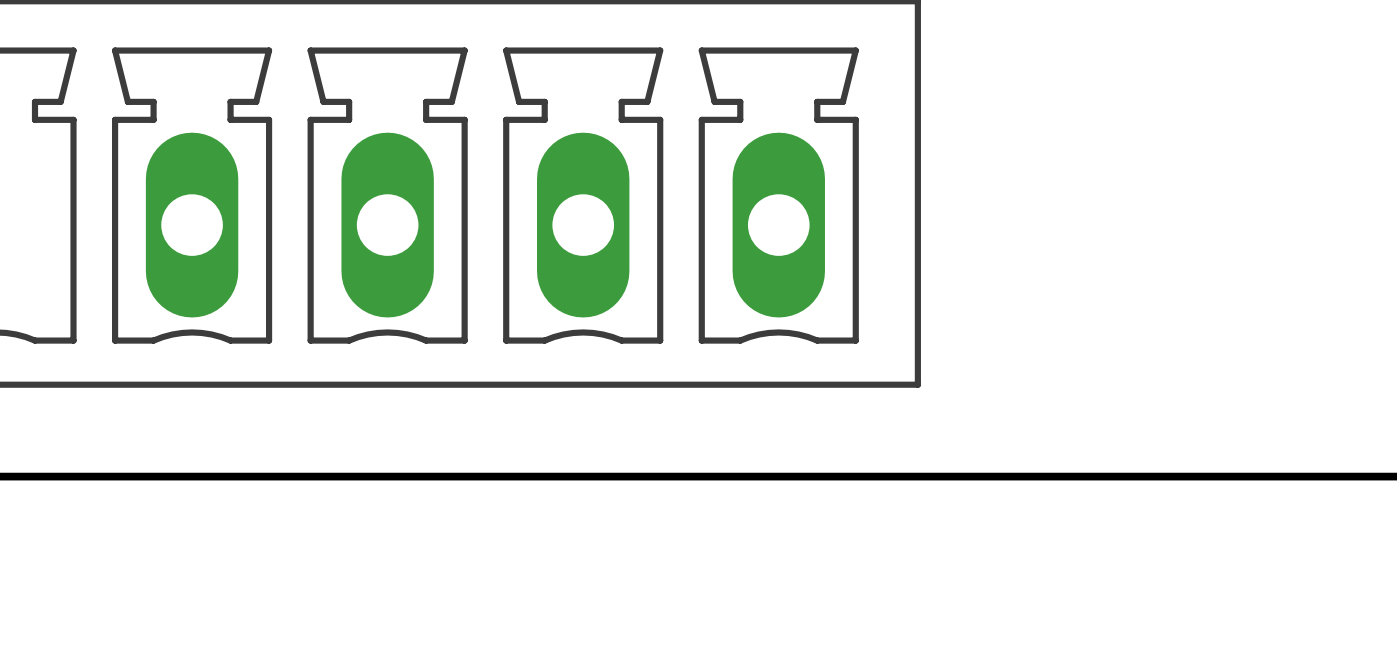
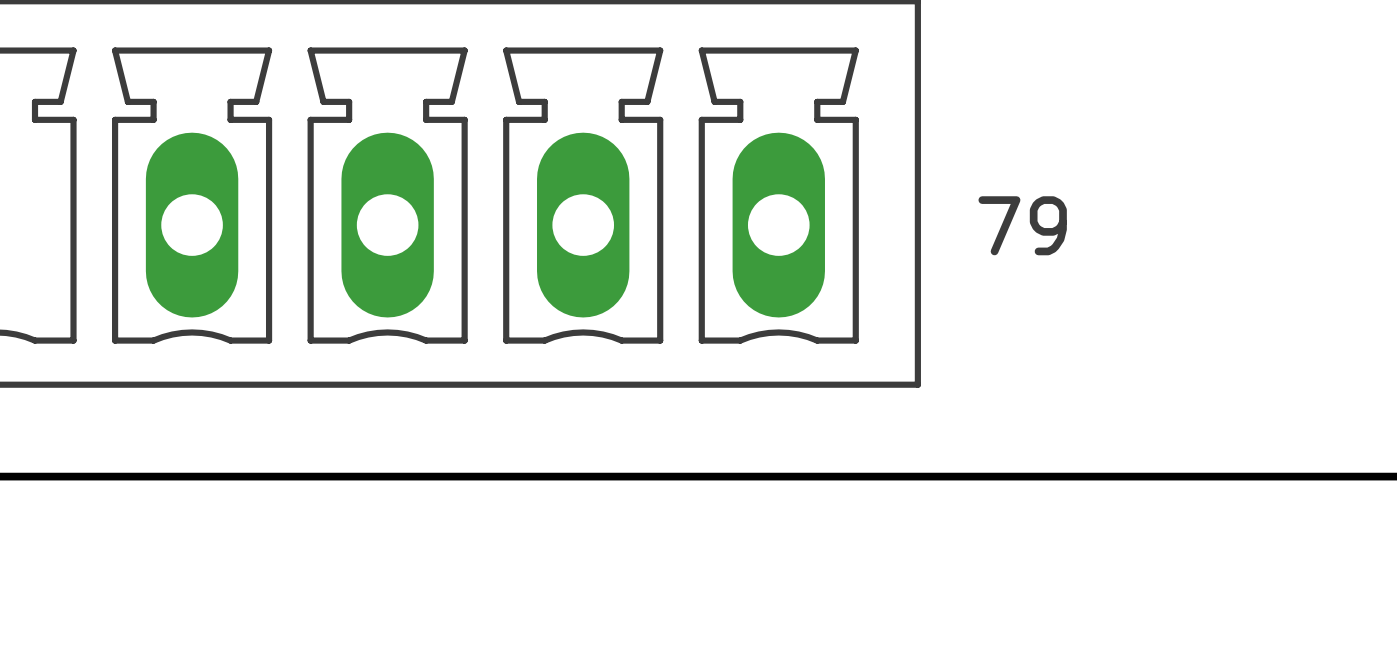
text: none -> 79 (1022, 225)

